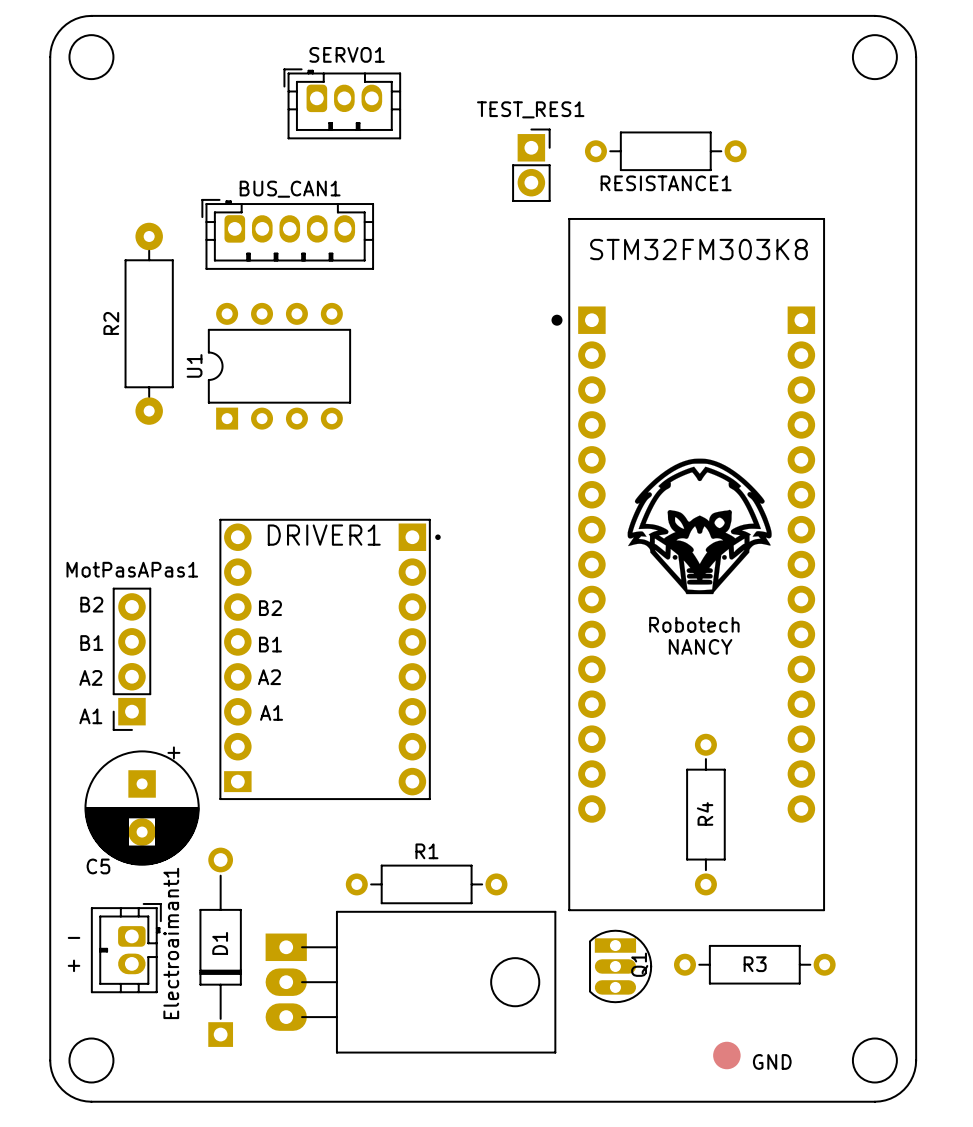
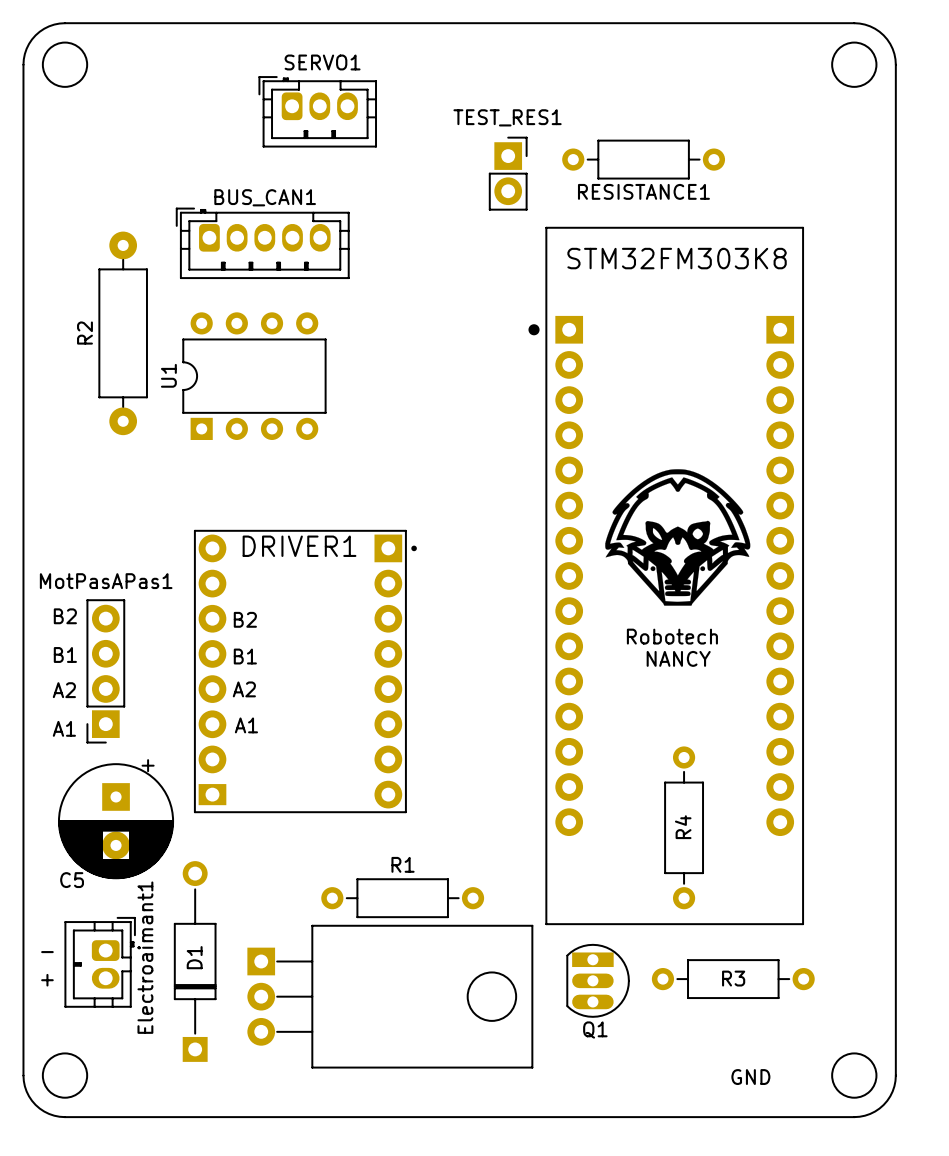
part footprint: [265, 910, 557, 1054] -> [247, 924, 534, 1069]
Q1 name rotation: 0° (639, 964) -> 90° clockwise (595, 1030)
Q1 name position: Q1 (639, 964) -> Q1 (595, 1030)
part: (726, 1055) -> none

